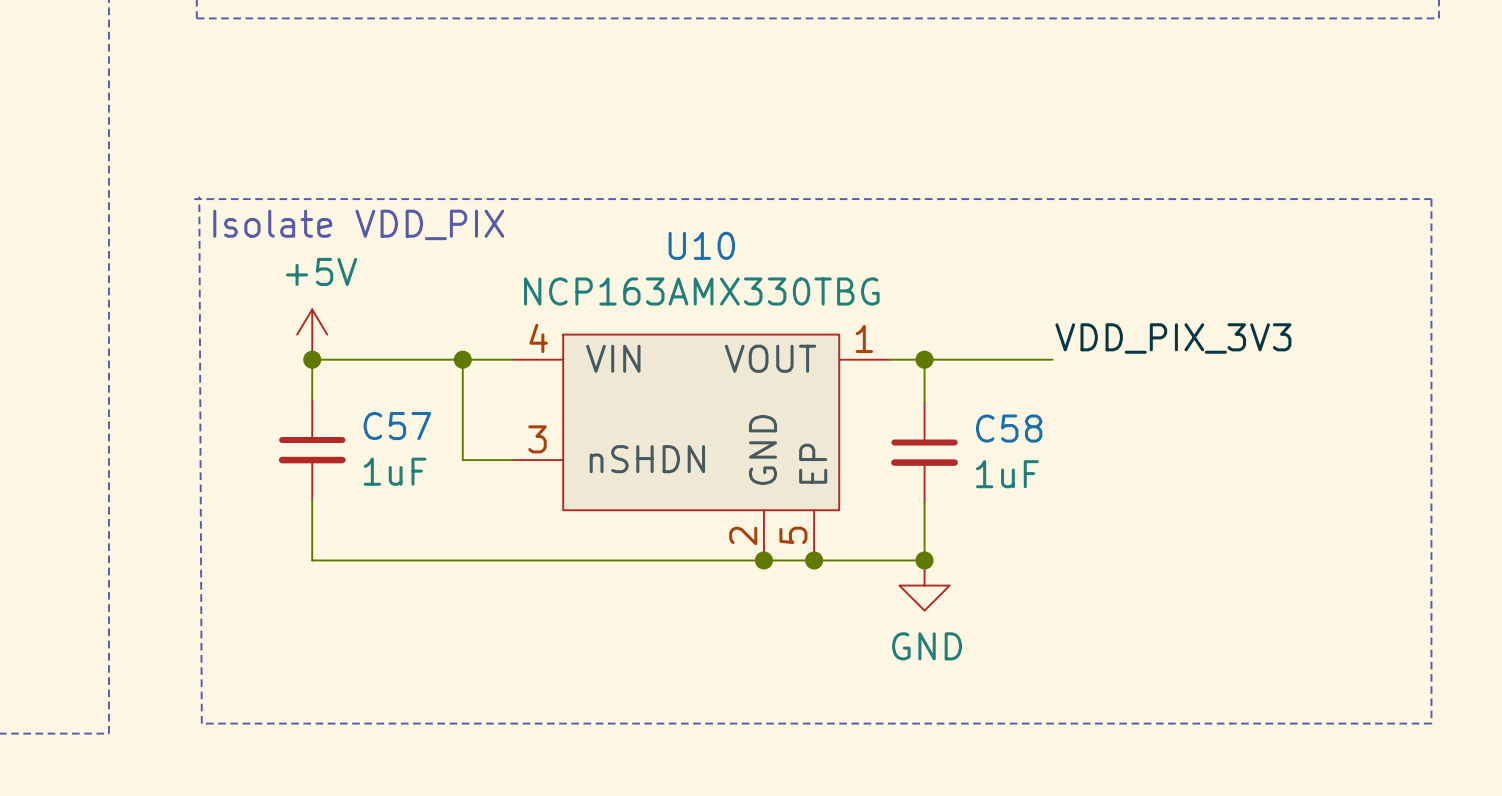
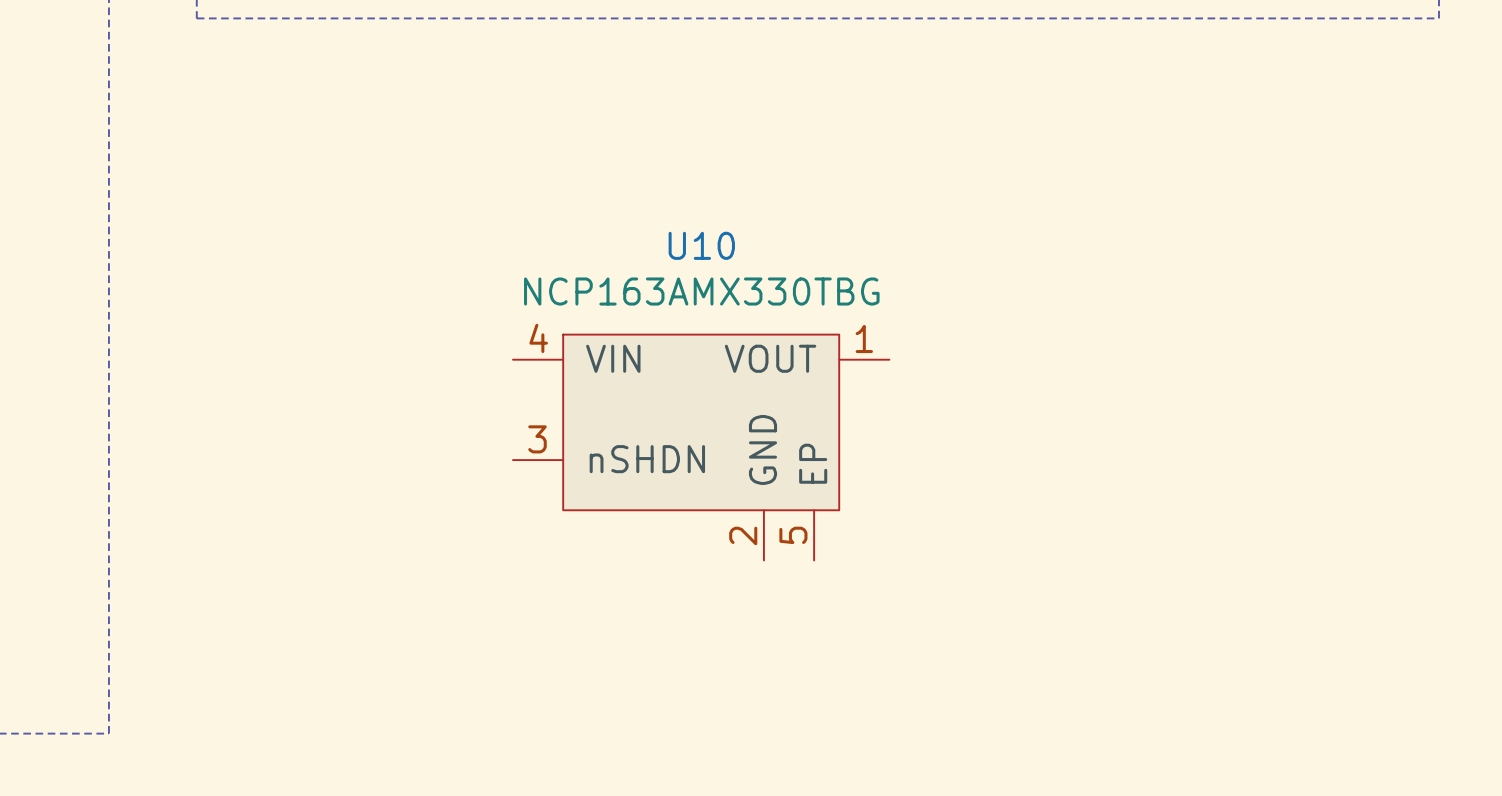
line: (199, 196) (201, 723) (1431, 723) (1431, 199) (194, 199) -> none
text: Isolate VDD_PIX (358, 224) -> none
power symbol: +5V (312, 334) -> none
label: VDD_PIX_3V3 (1173, 338) -> none
junction: (312, 359) -> none
wire: (462, 359) (462, 460) (512, 460) -> none
junction: (462, 359) -> none
wire: (512, 359) (312, 359) (312, 399) -> none
wire: (889, 359) (1052, 359) -> none
wire: (924, 359) (924, 402) -> none
junction: (924, 359) -> none
C57: (312, 450) -> none
C58: (924, 452) -> none
wire: (312, 500) (312, 560) (924, 560) (924, 502) -> none
junction: (763, 560) -> none
junction: (814, 560) -> none
junction: (924, 560) -> none
power symbol: GND (924, 585) -> none

